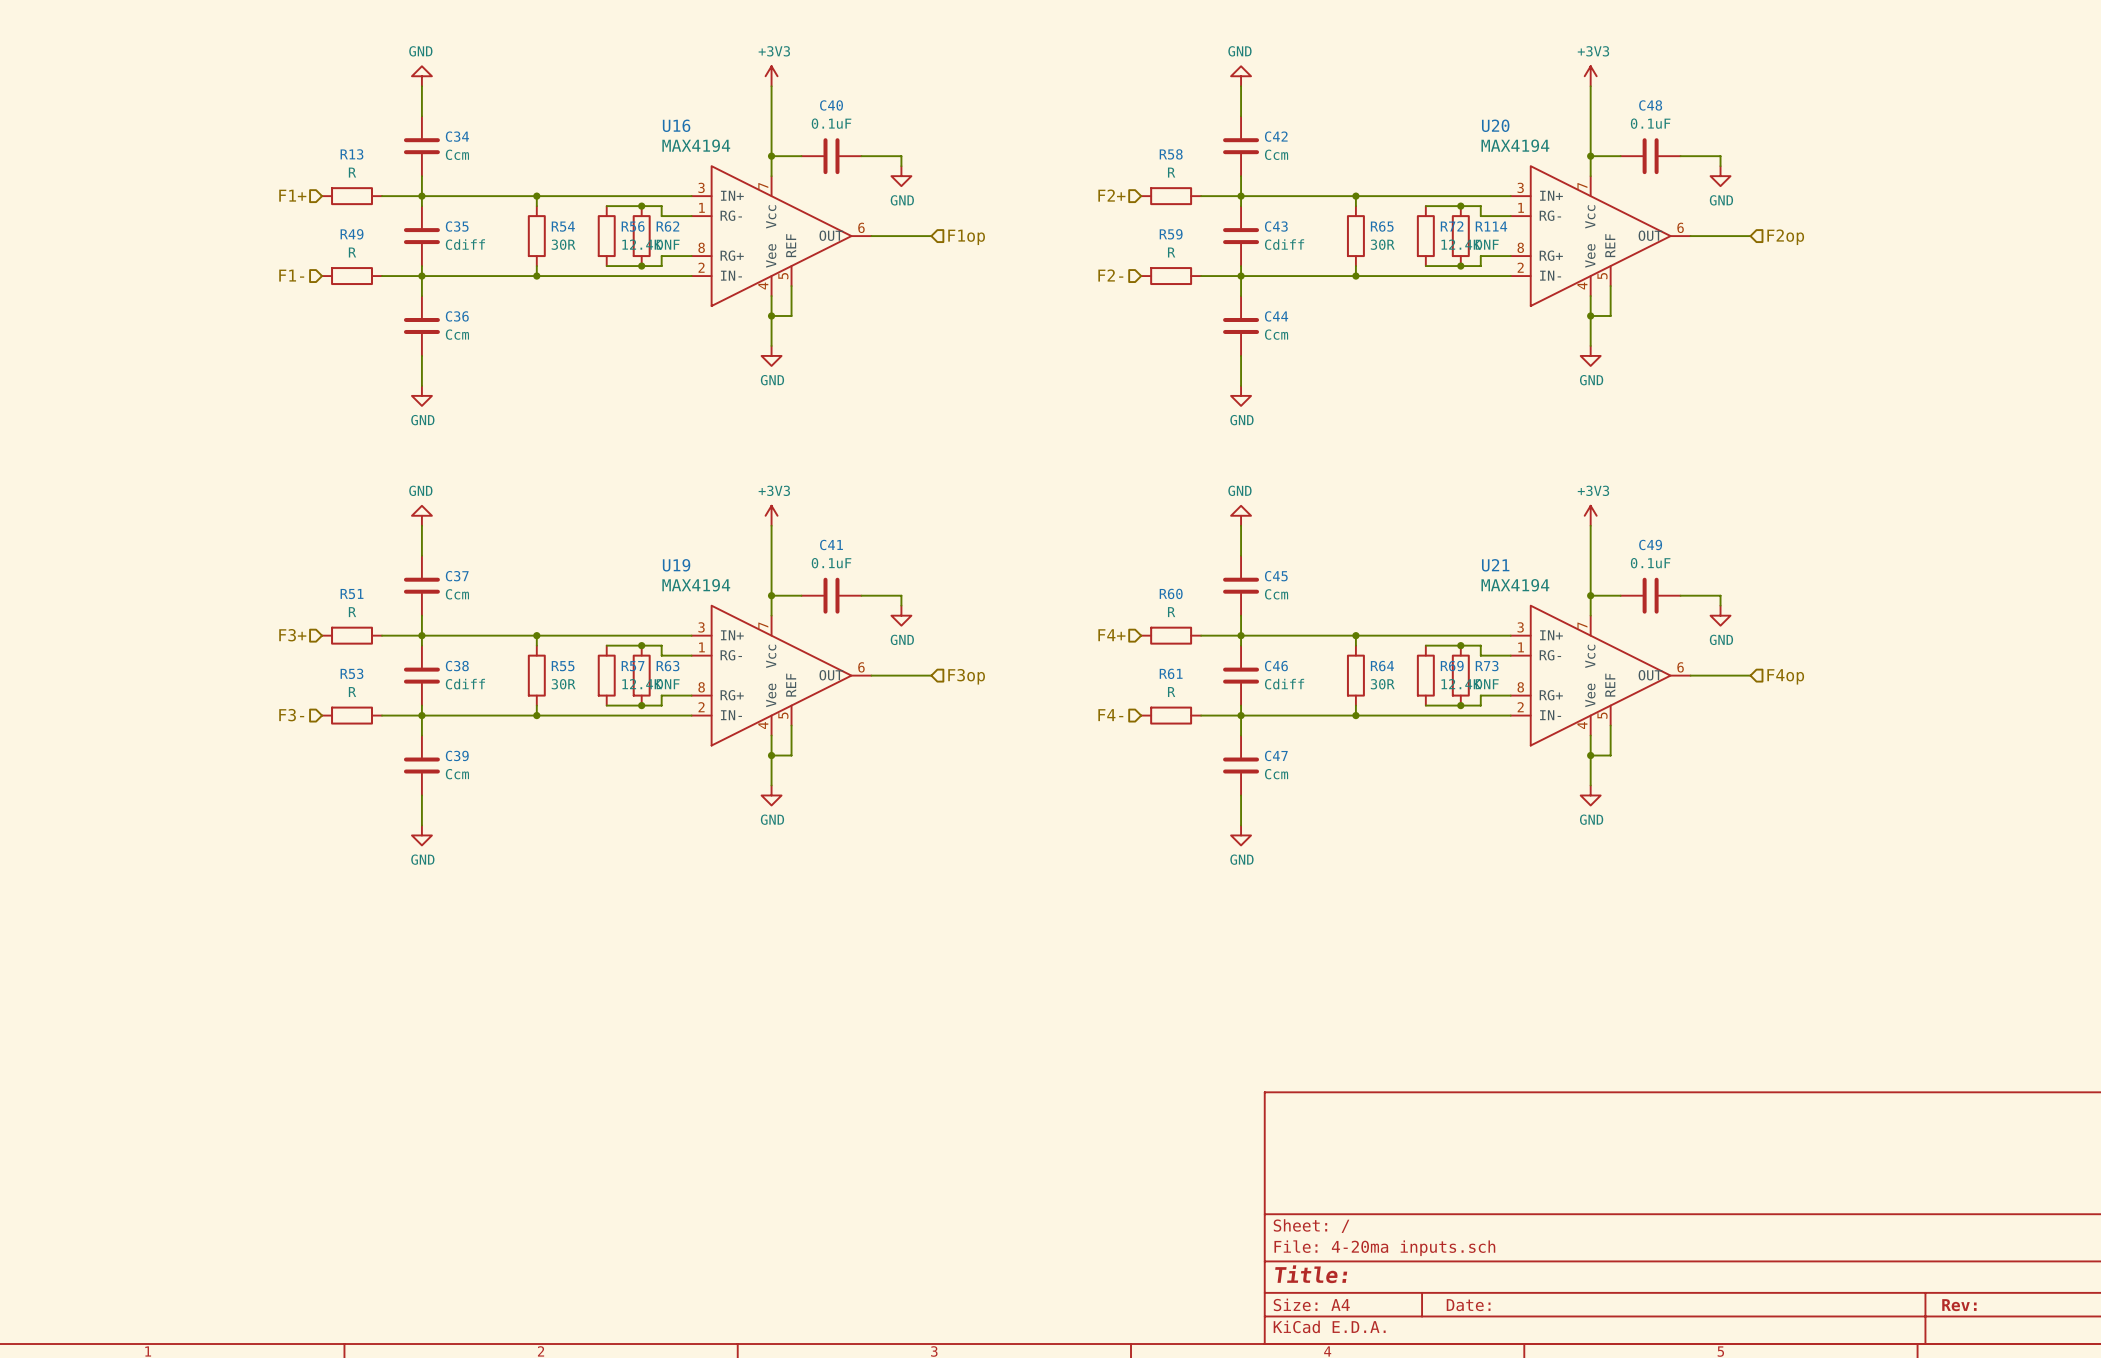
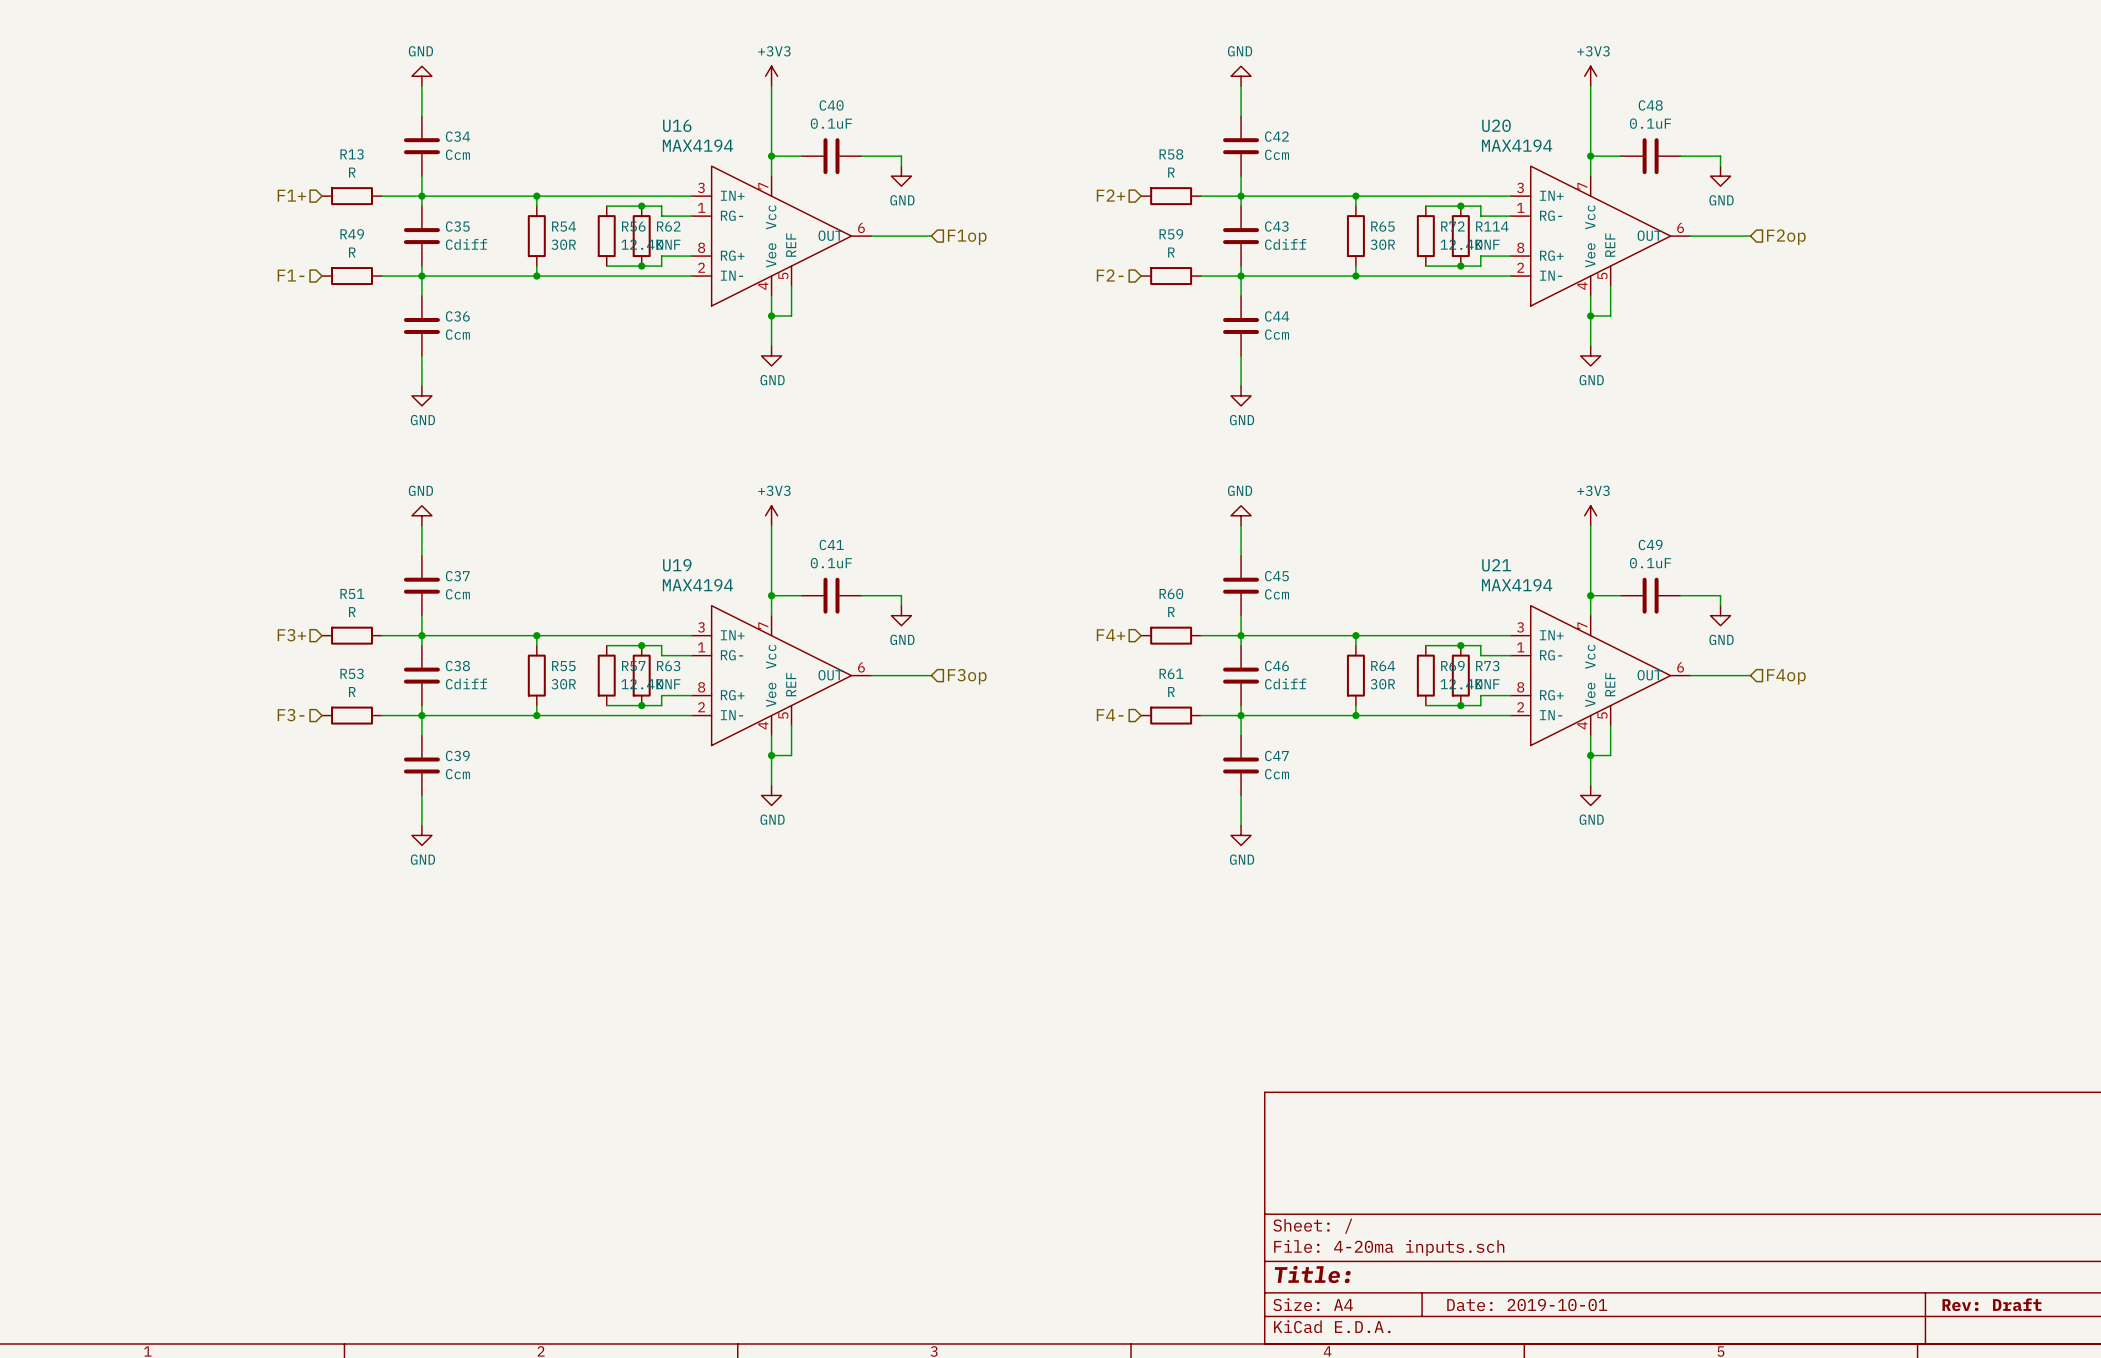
title block: Date: (1468, 1305) -> Date: 2019-10-01 (1527, 1305)
title block: Rev: (1959, 1305) -> Rev: Draft (1991, 1304)

